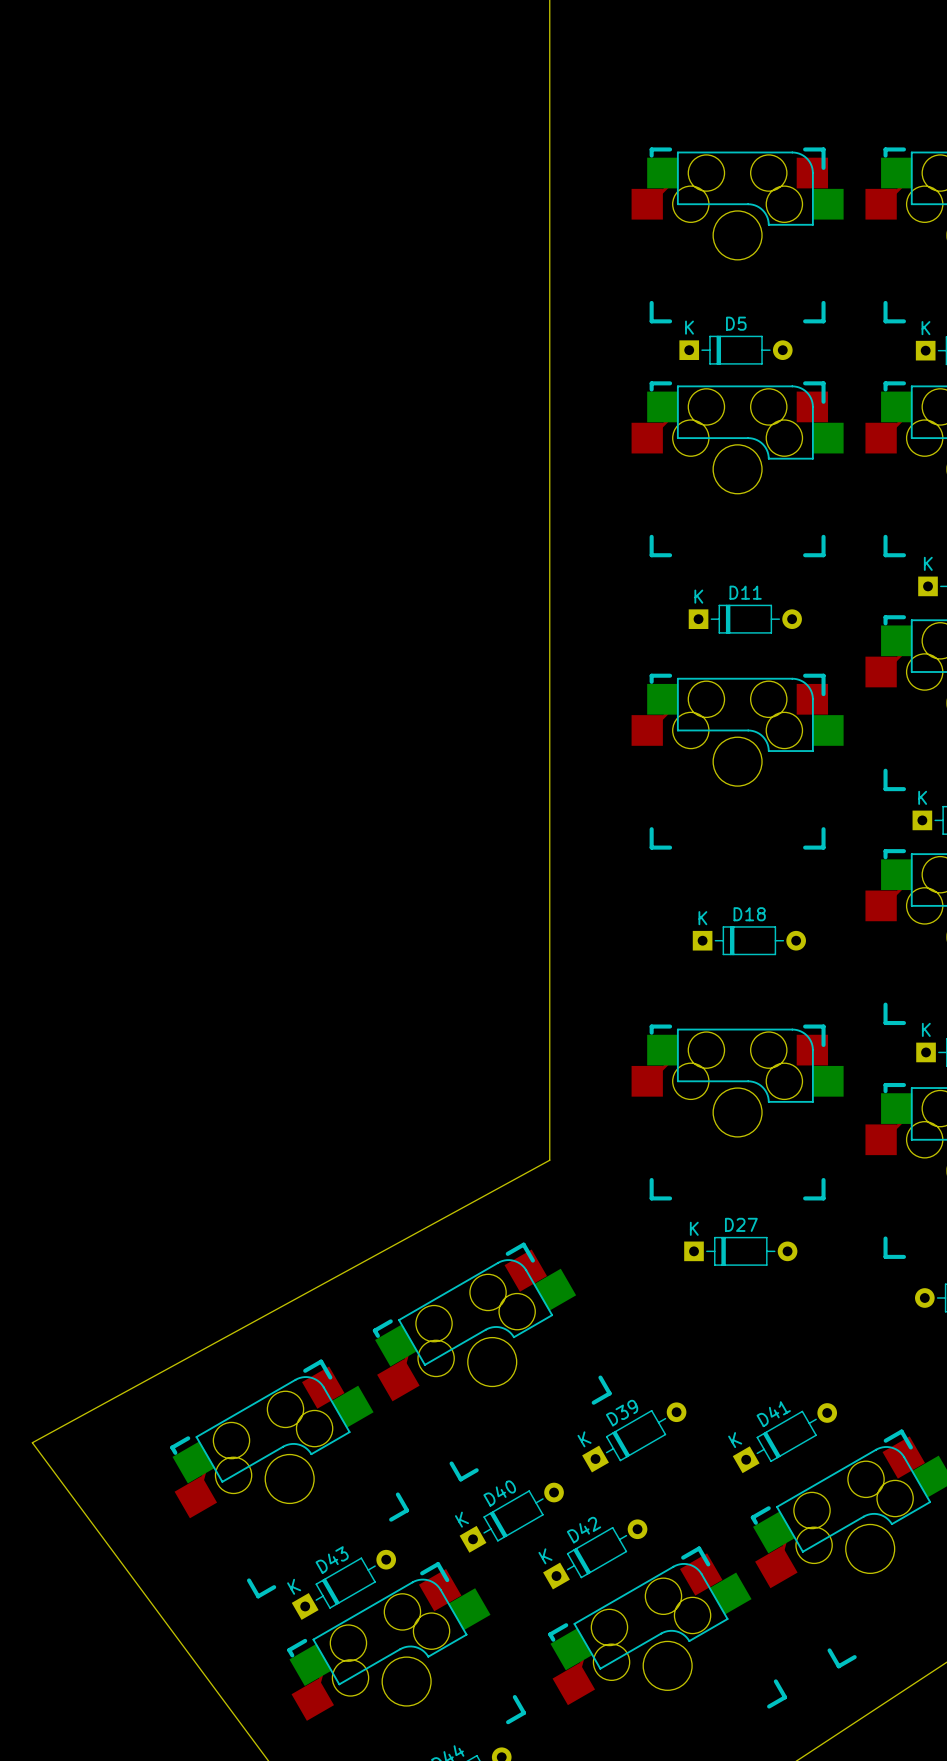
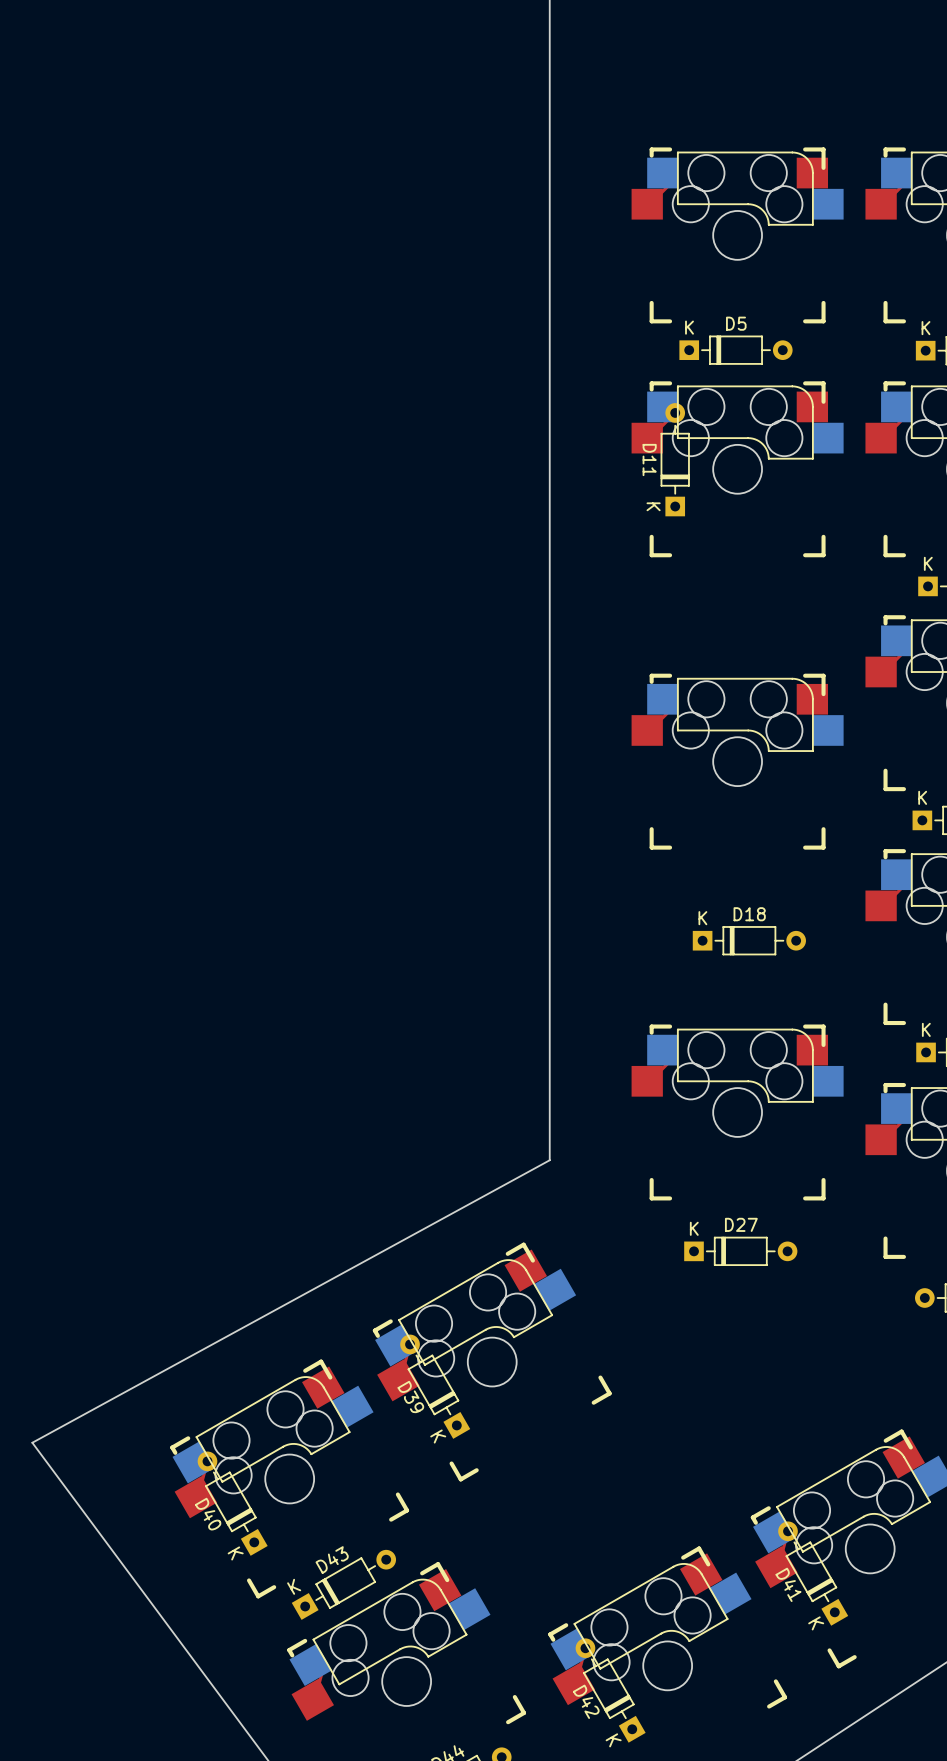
D11 rotation: 0° (745, 619) -> 90° counterclockwise (675, 459)
D11 position: (745, 619) -> (675, 459)
D39 rotation: 0° (634, 1437) -> 90° counterclockwise (435, 1386)
D39 position: (634, 1437) -> (435, 1386)
D41 rotation: 0° (784, 1438) -> 90° counterclockwise (813, 1573)
D41 position: (784, 1438) -> (813, 1573)
D40 rotation: 0° (511, 1517) -> 90° counterclockwise (232, 1503)
D40 position: (511, 1517) -> (232, 1503)
D42 rotation: 0° (595, 1554) -> 90° counterclockwise (610, 1690)
D42 position: (595, 1554) -> (610, 1690)

